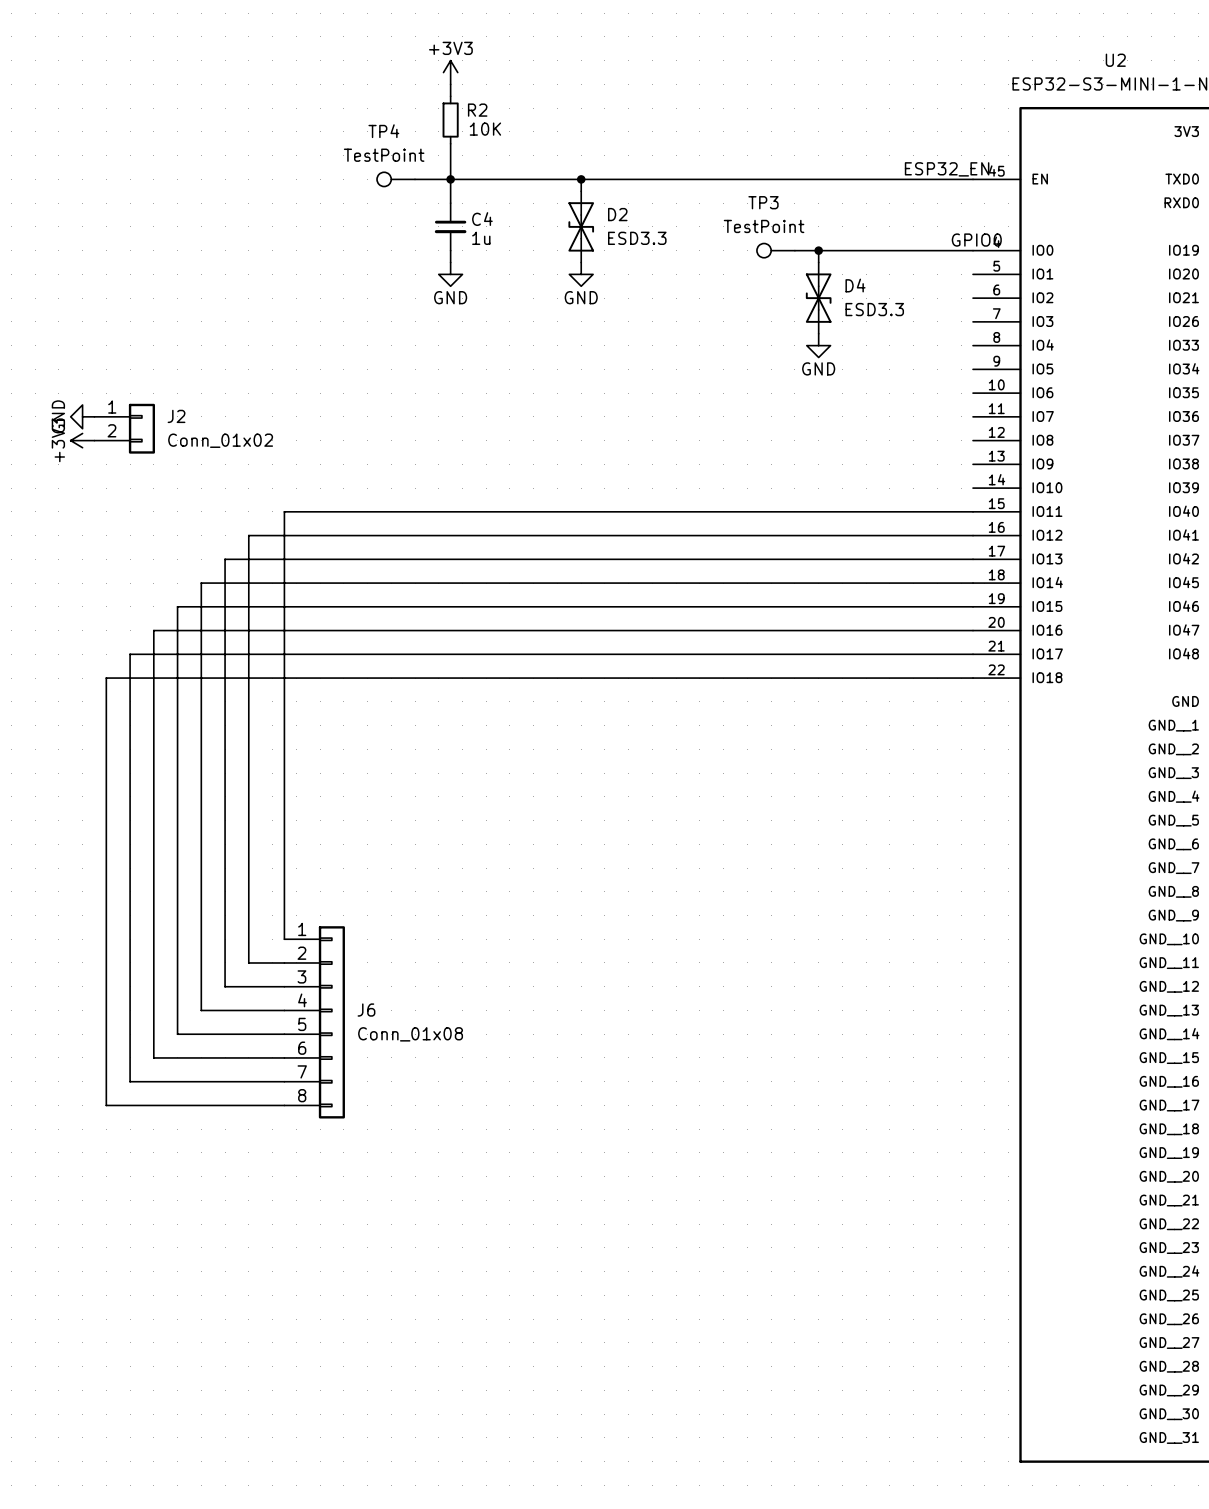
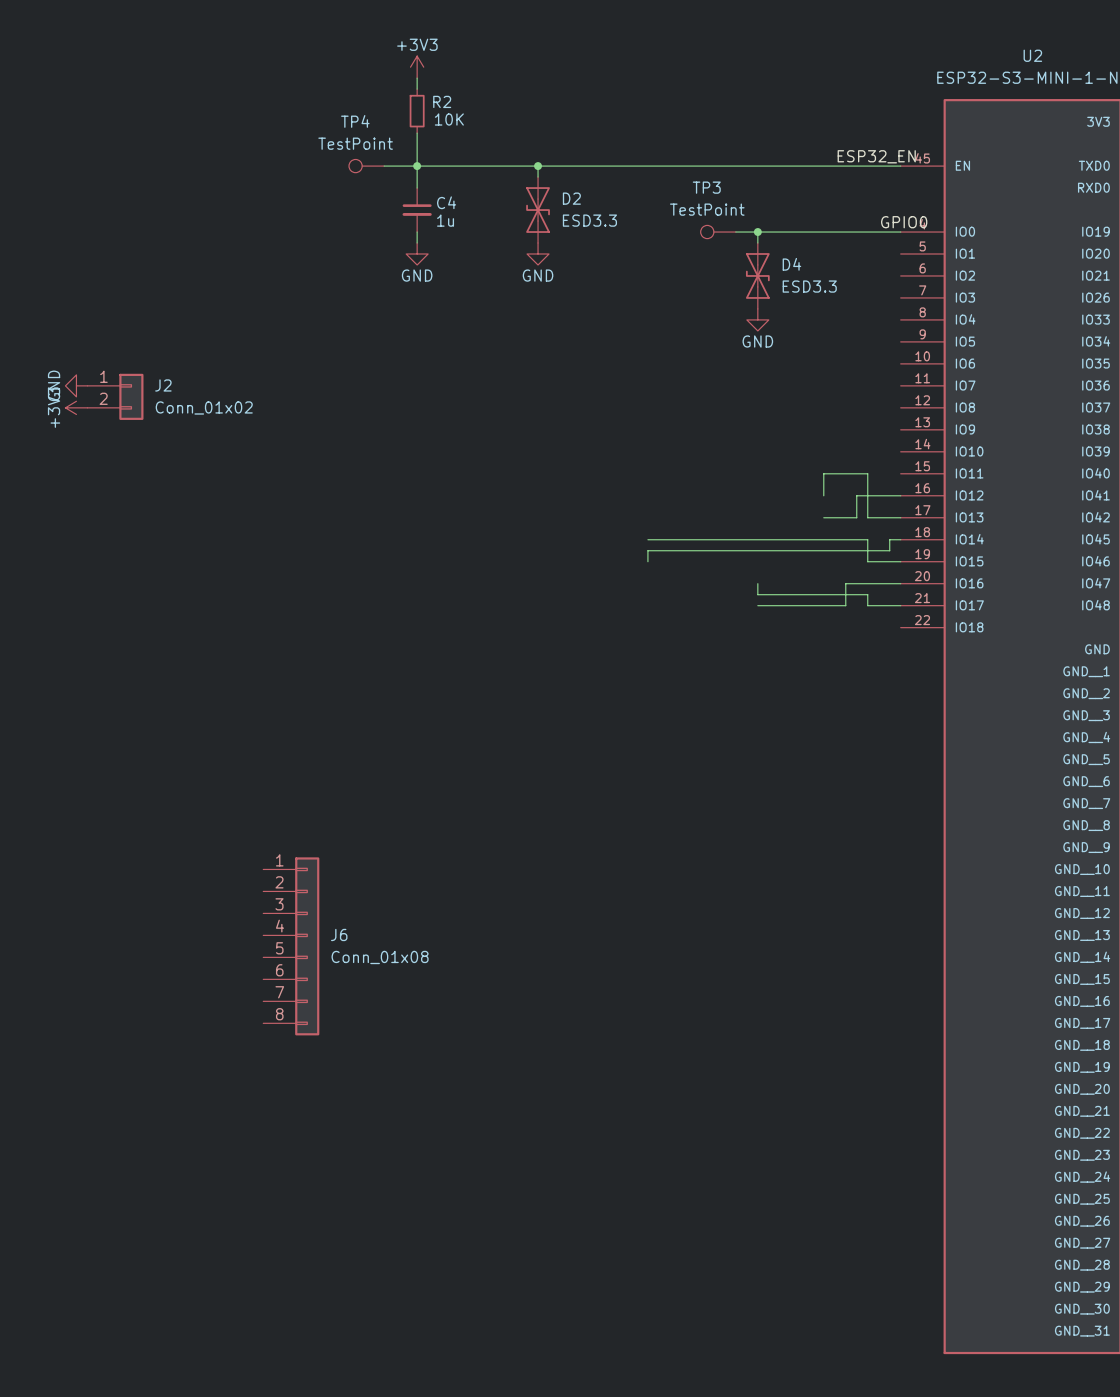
wire: (889, 511) (284, 511) (284, 939) -> (823, 473) (823, 495)
wire: (937, 511) (973, 511) -> (867, 473) (867, 517)
wire: (925, 535) (248, 535) (248, 962) (284, 962) -> none
wire: (889, 559) (225, 559) (225, 986) (284, 986) -> none
wire: (925, 559) (937, 559) -> (856, 517) (856, 495)
wire: (699, 583) (201, 583) (201, 1010) (284, 1010) -> none
wire: (937, 583) (961, 583) -> (867, 539) (867, 561)
wire: none -> (889, 539) (889, 550) (647, 550) (647, 561)
wire: (937, 606) (177, 606) (177, 1034) (284, 1034) -> none
wire: none -> (757, 583) (757, 594) (867, 594) (867, 605)
wire: (913, 630) (153, 630) (153, 1057) (284, 1057) -> none
wire: (818, 654) (130, 654) (130, 1081) (284, 1081) -> none
wire: (913, 654) (937, 654) -> (845, 605) (845, 583)
wire: (973, 678) (106, 678) (106, 1105) (284, 1105) -> none

